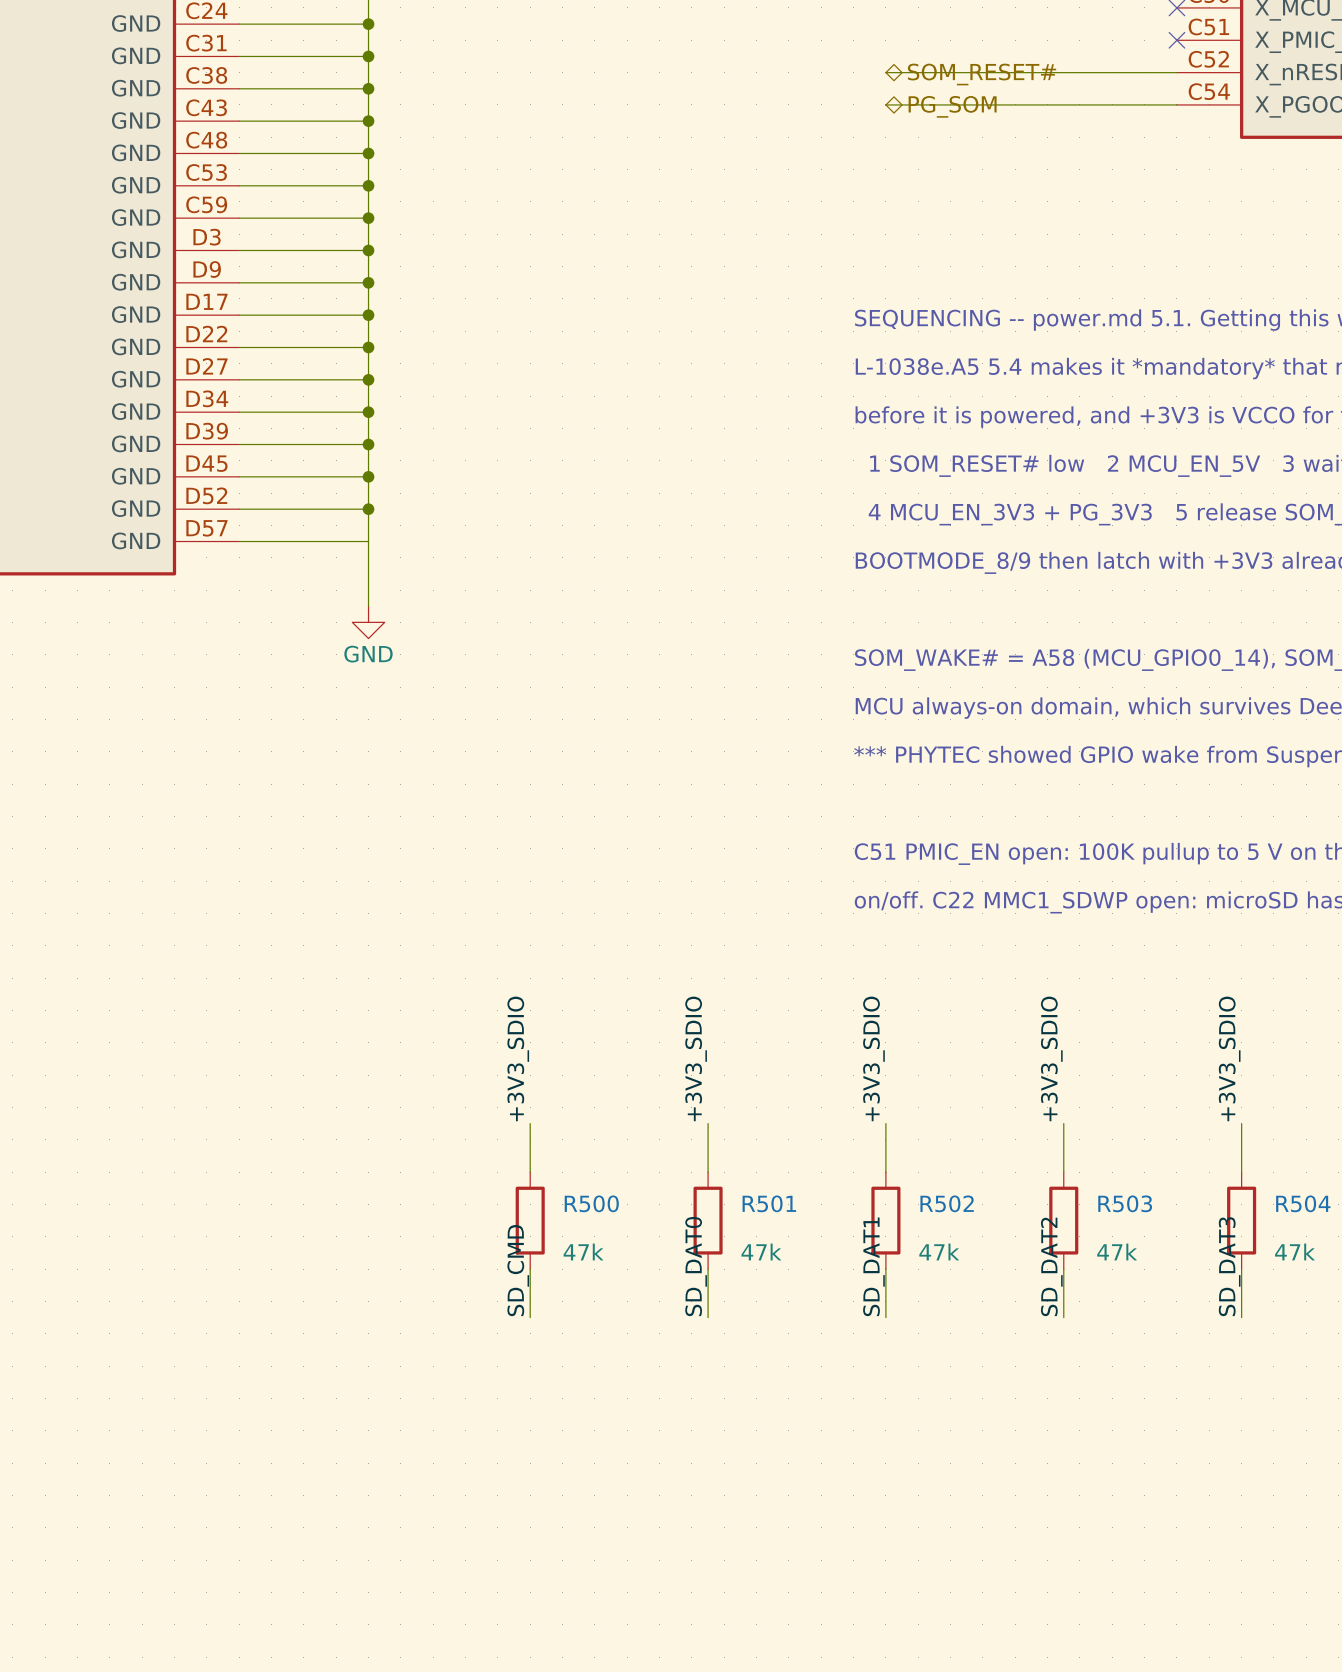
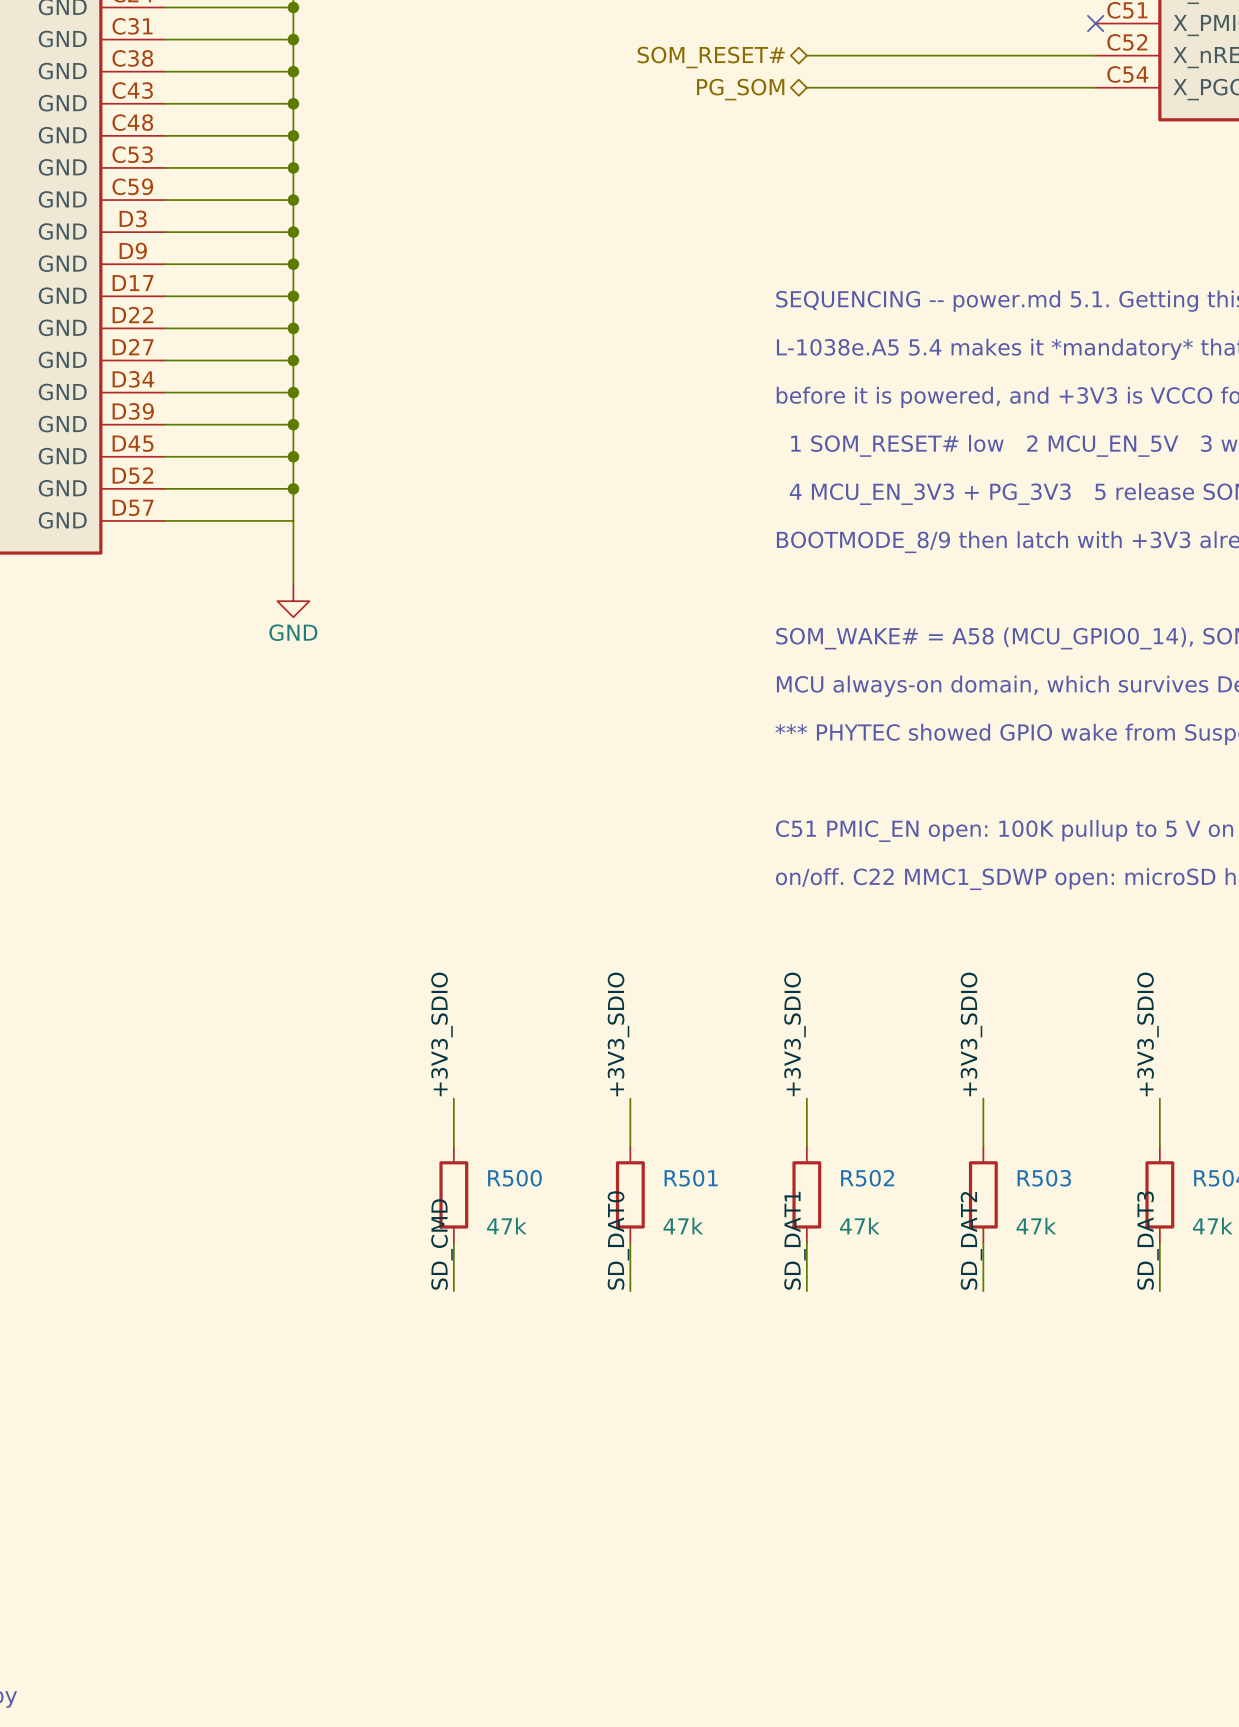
hierarchical label rotation: 0° (982, 74) -> 180° (711, 57)
hierarchical label position: SOM_RESET# (982, 74) -> SOM_RESET# (711, 57)
hierarchical label rotation: 0° (952, 106) -> 180° (740, 89)
hierarchical label position: PG_SOM (952, 106) -> PG_SOM (740, 89)

